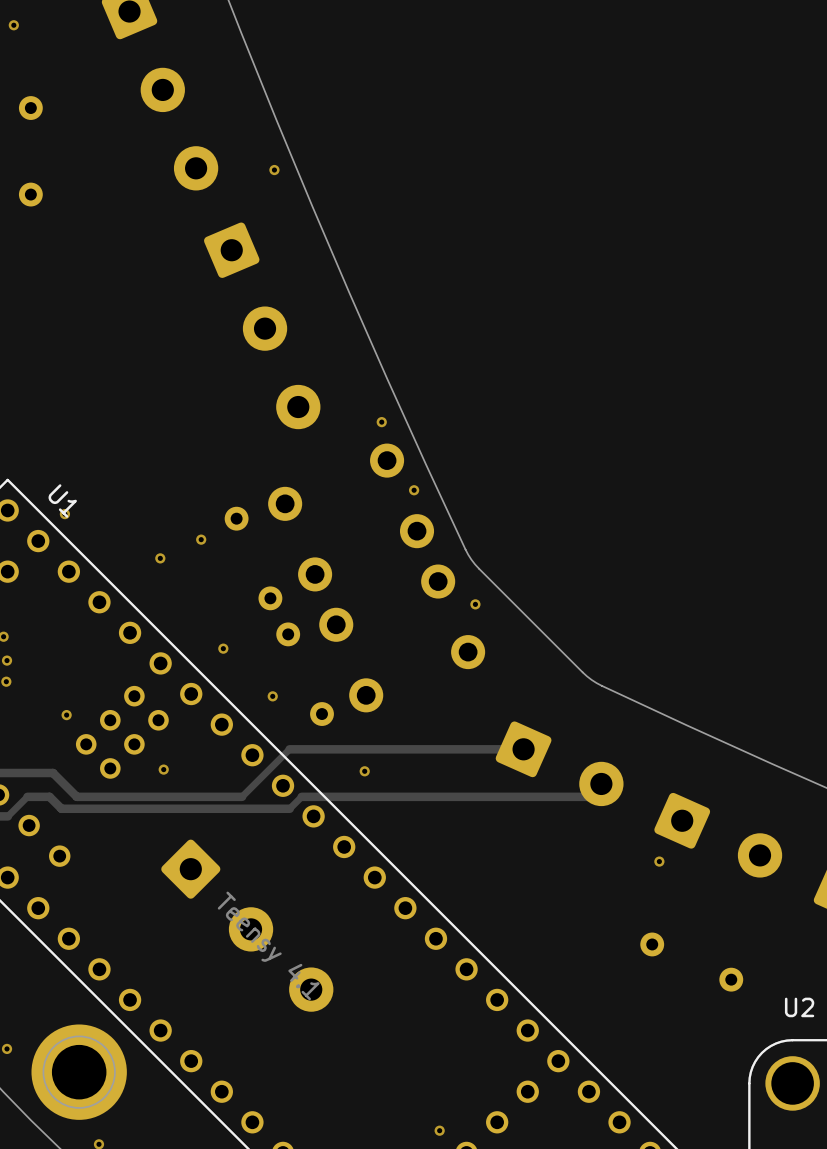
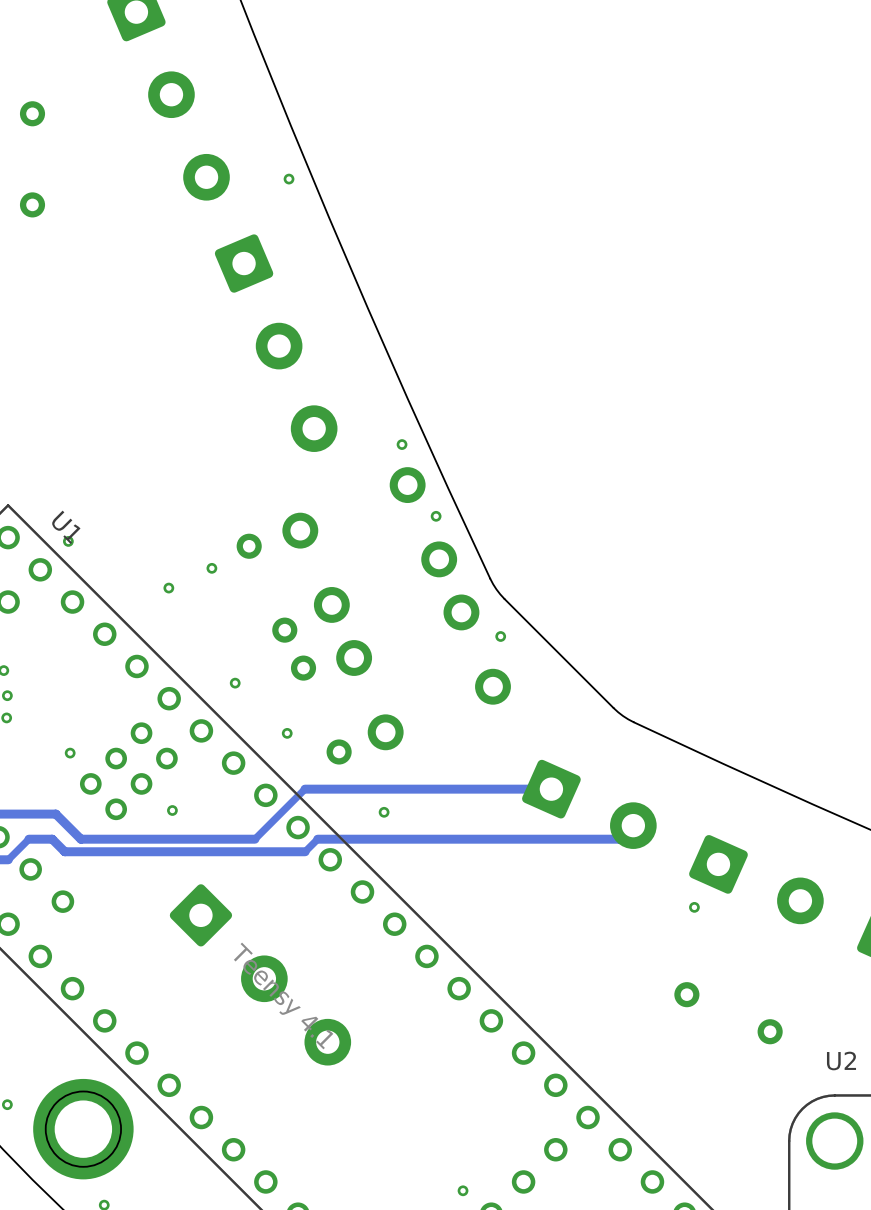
via: (13, 25) -> none

